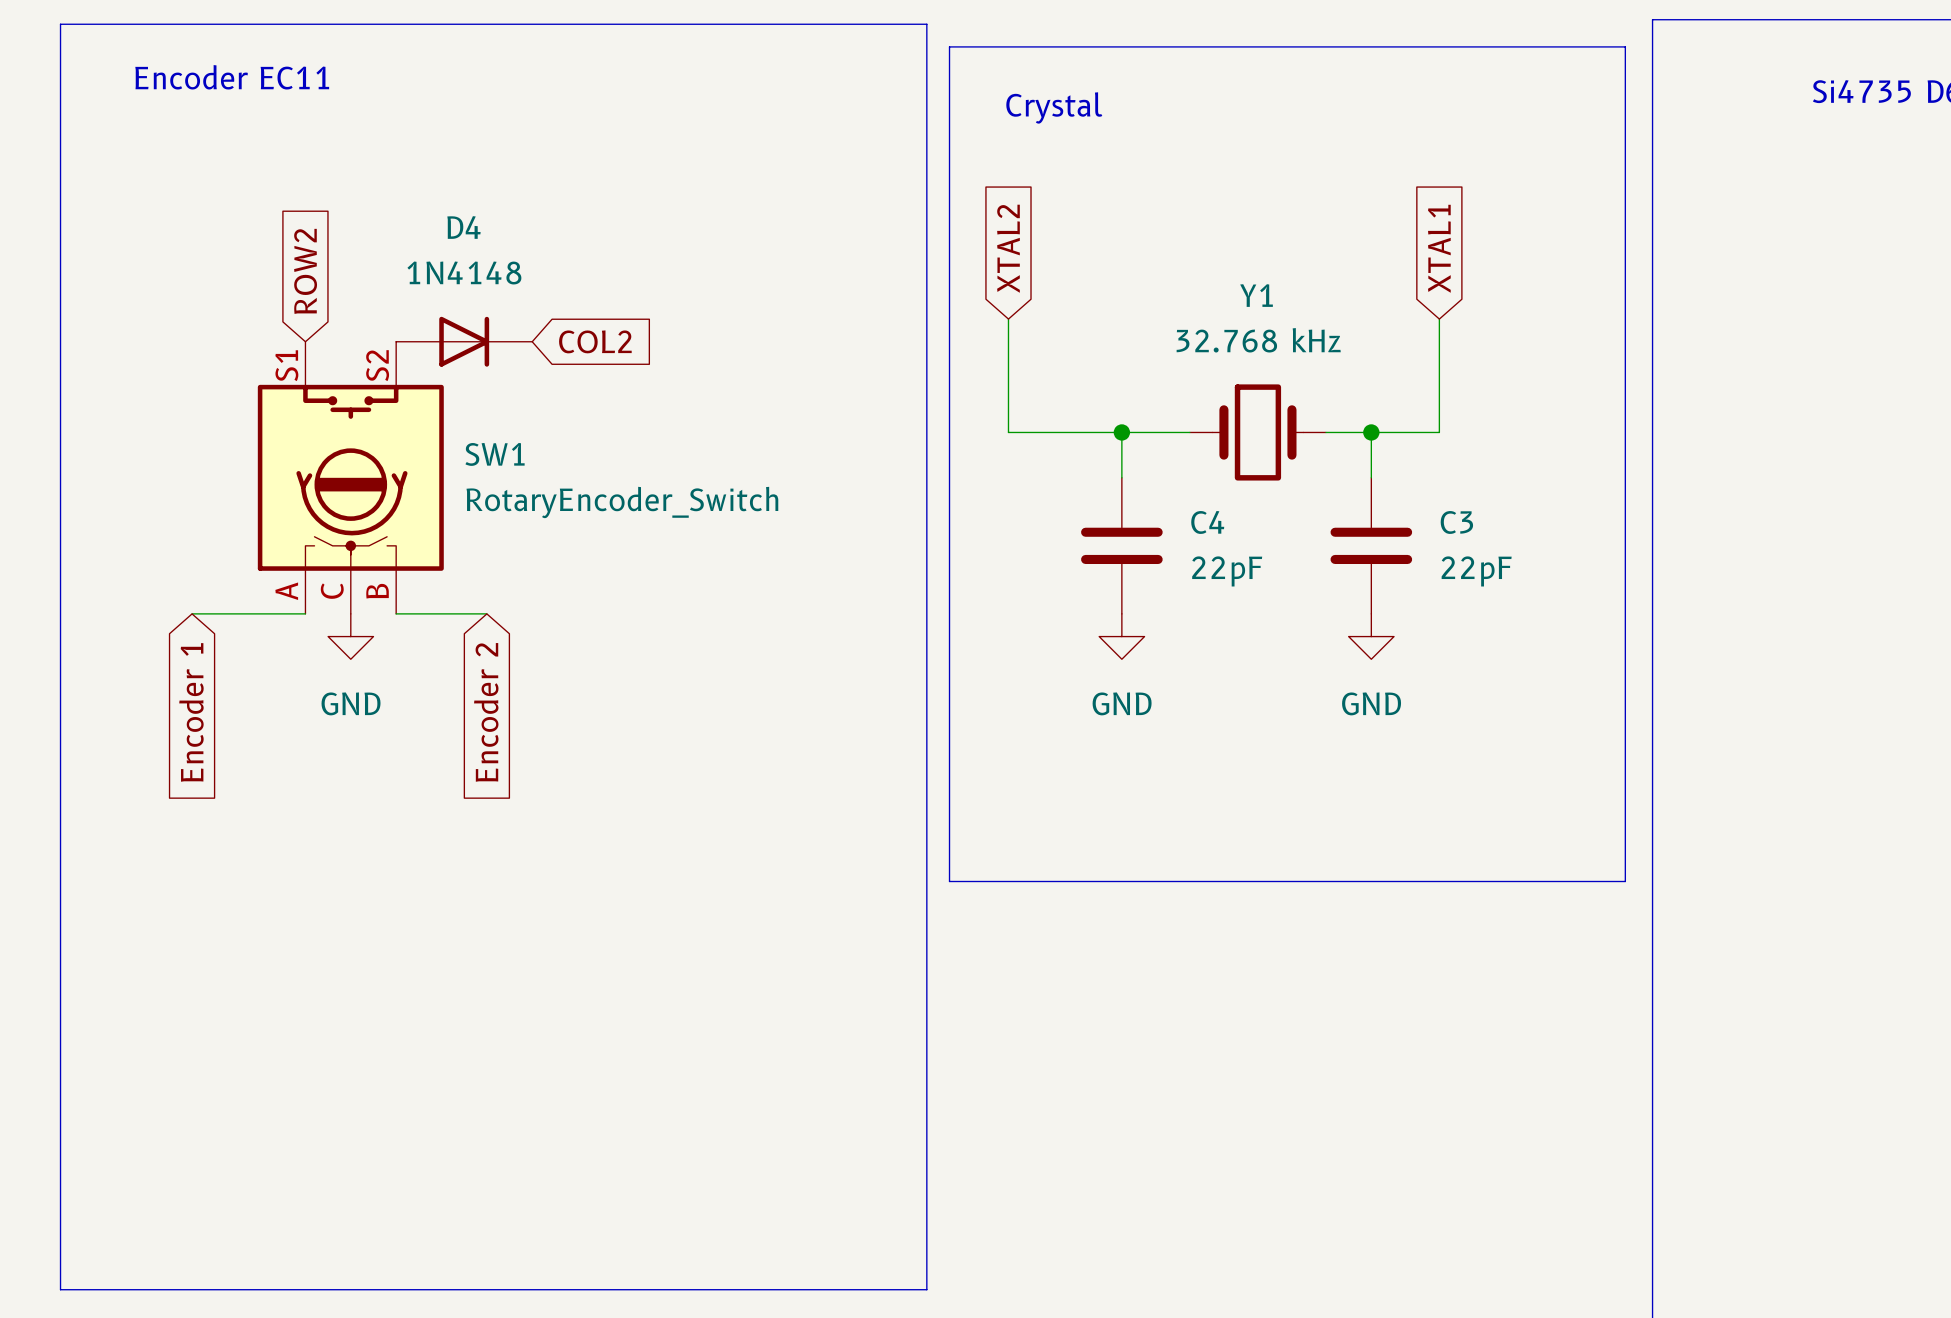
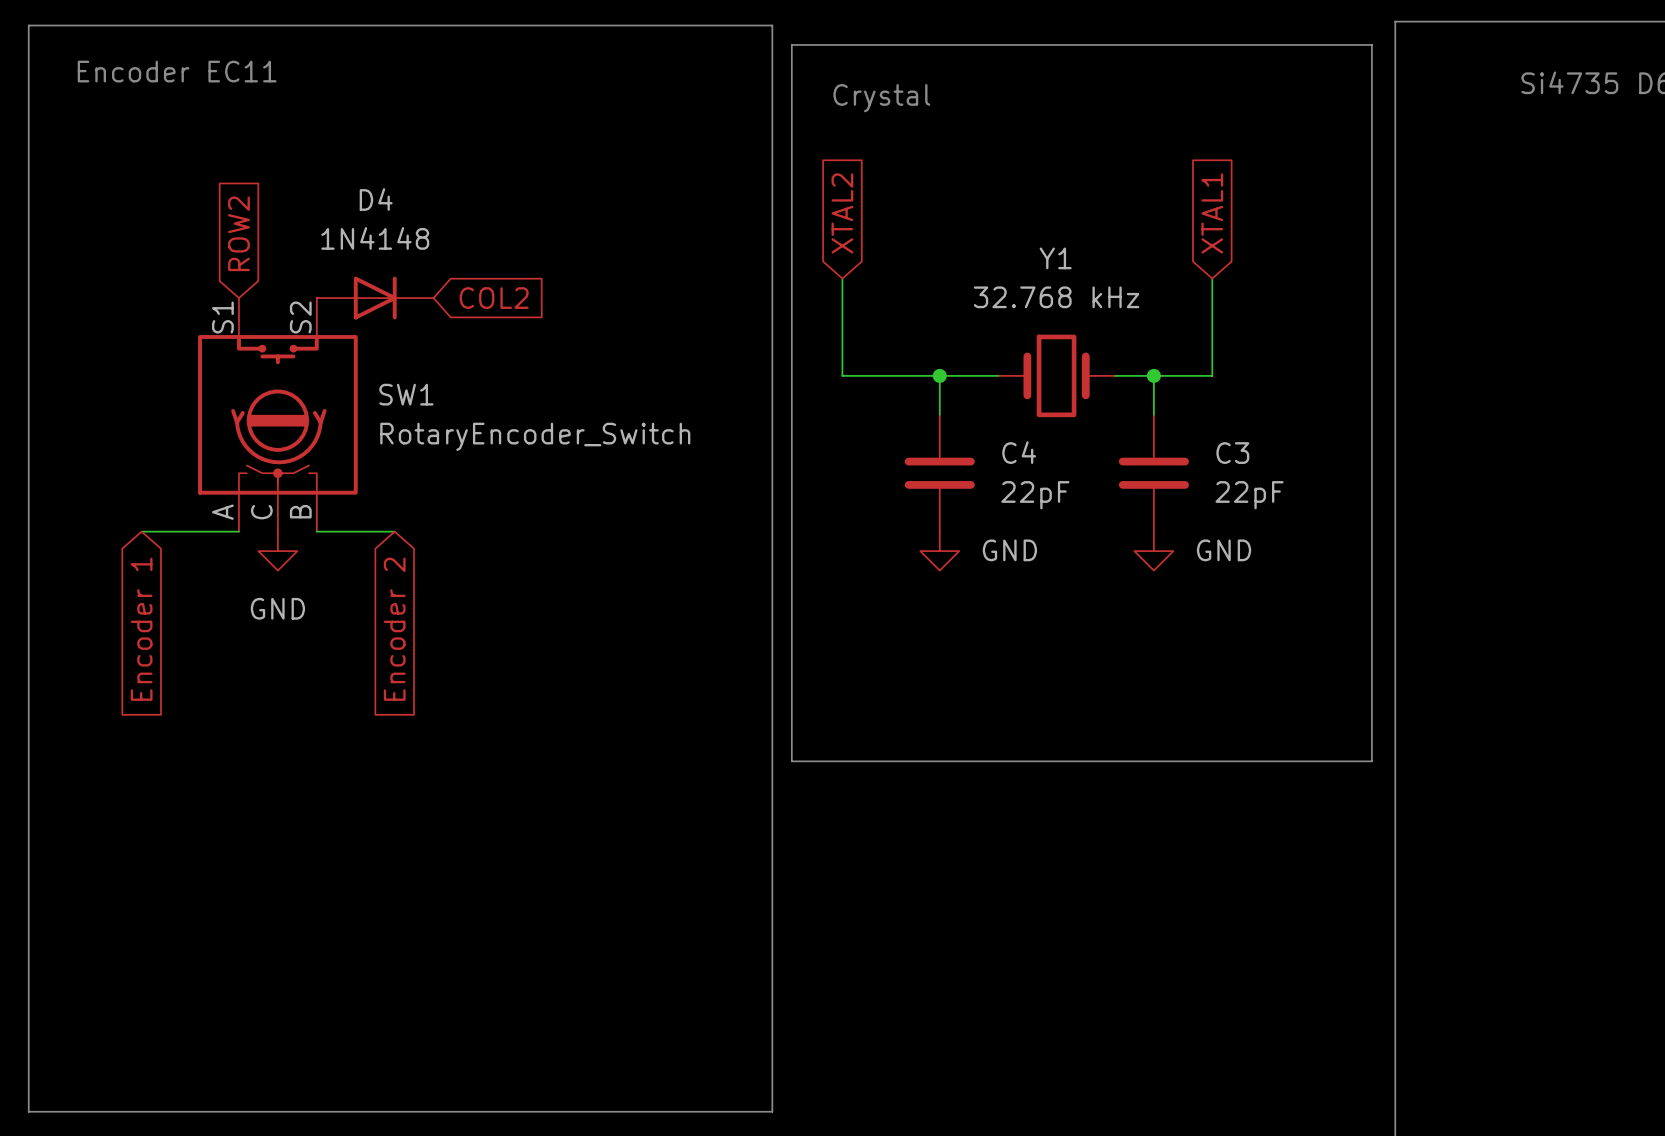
power symbol text position: GND (1122, 703) -> GND (1009, 550)
power symbol text position: GND (1371, 703) -> GND (1224, 550)

